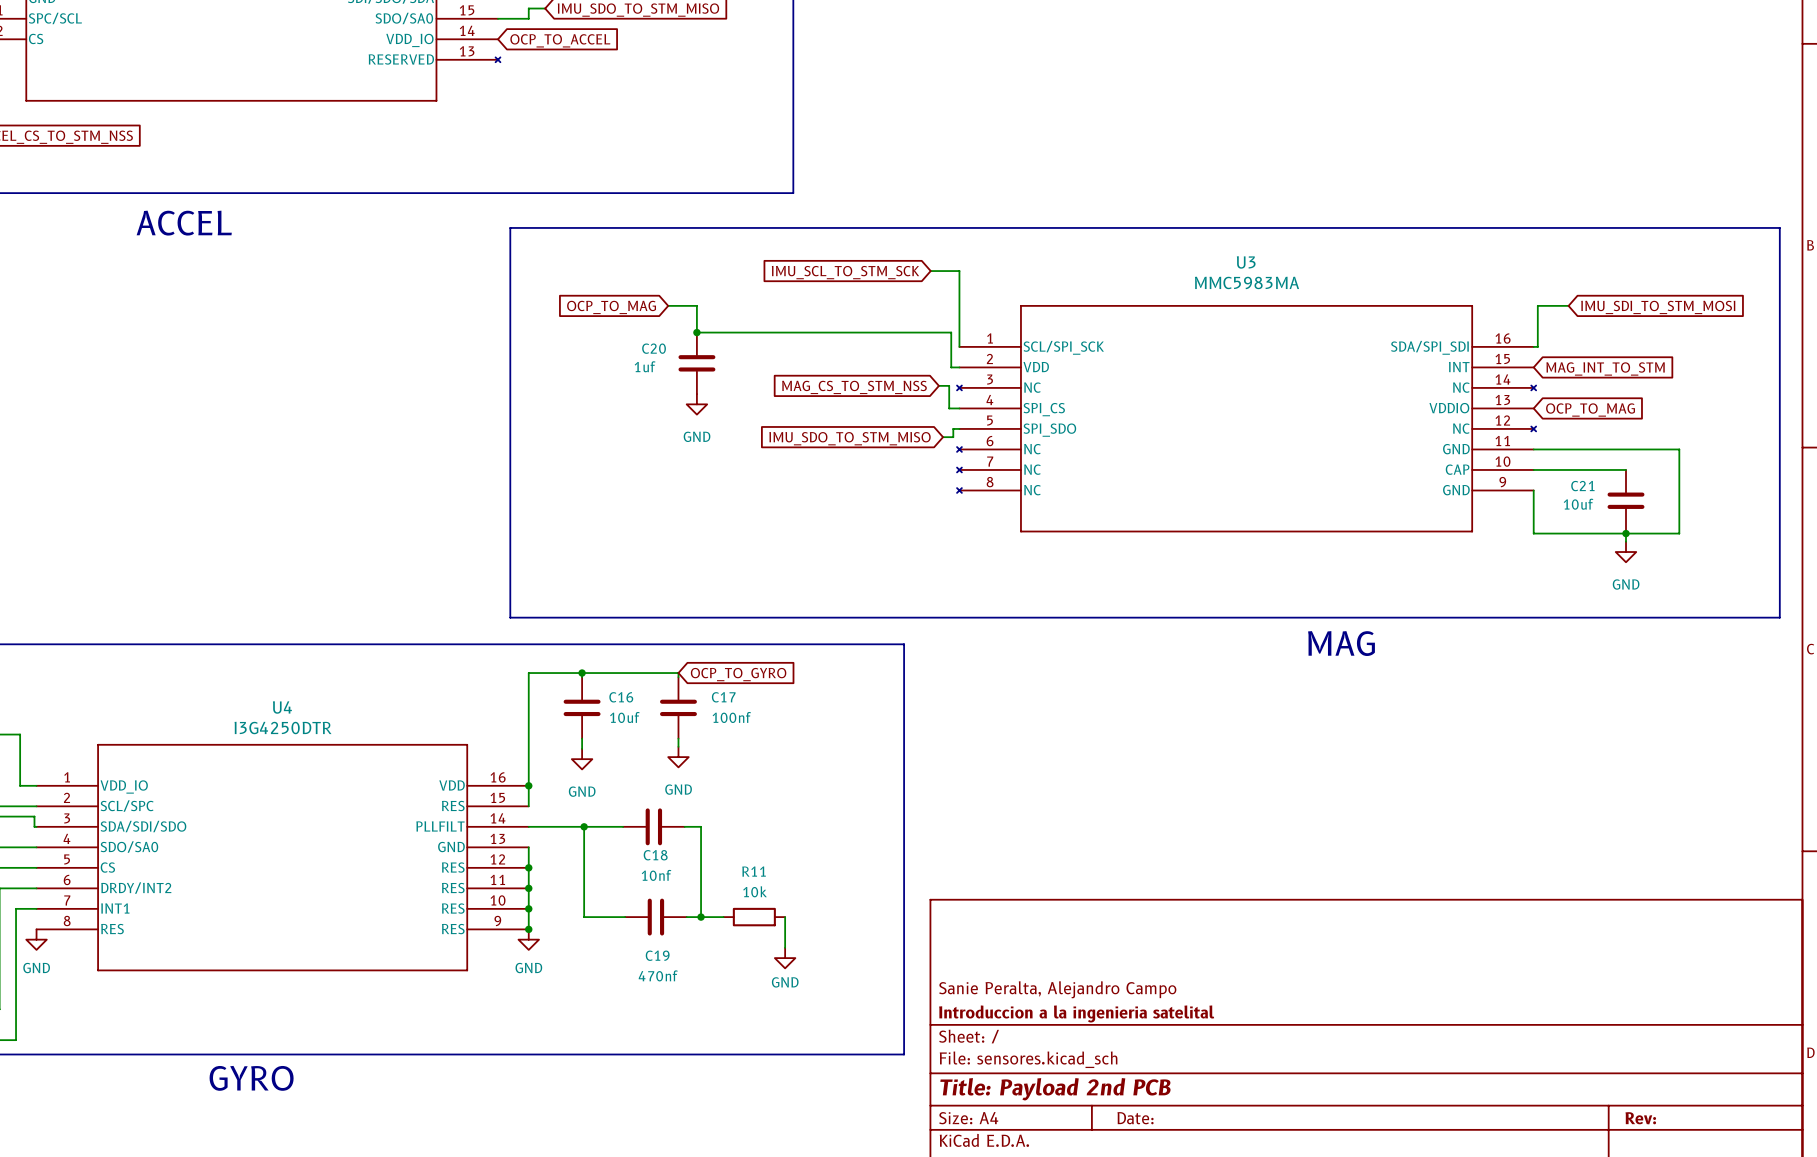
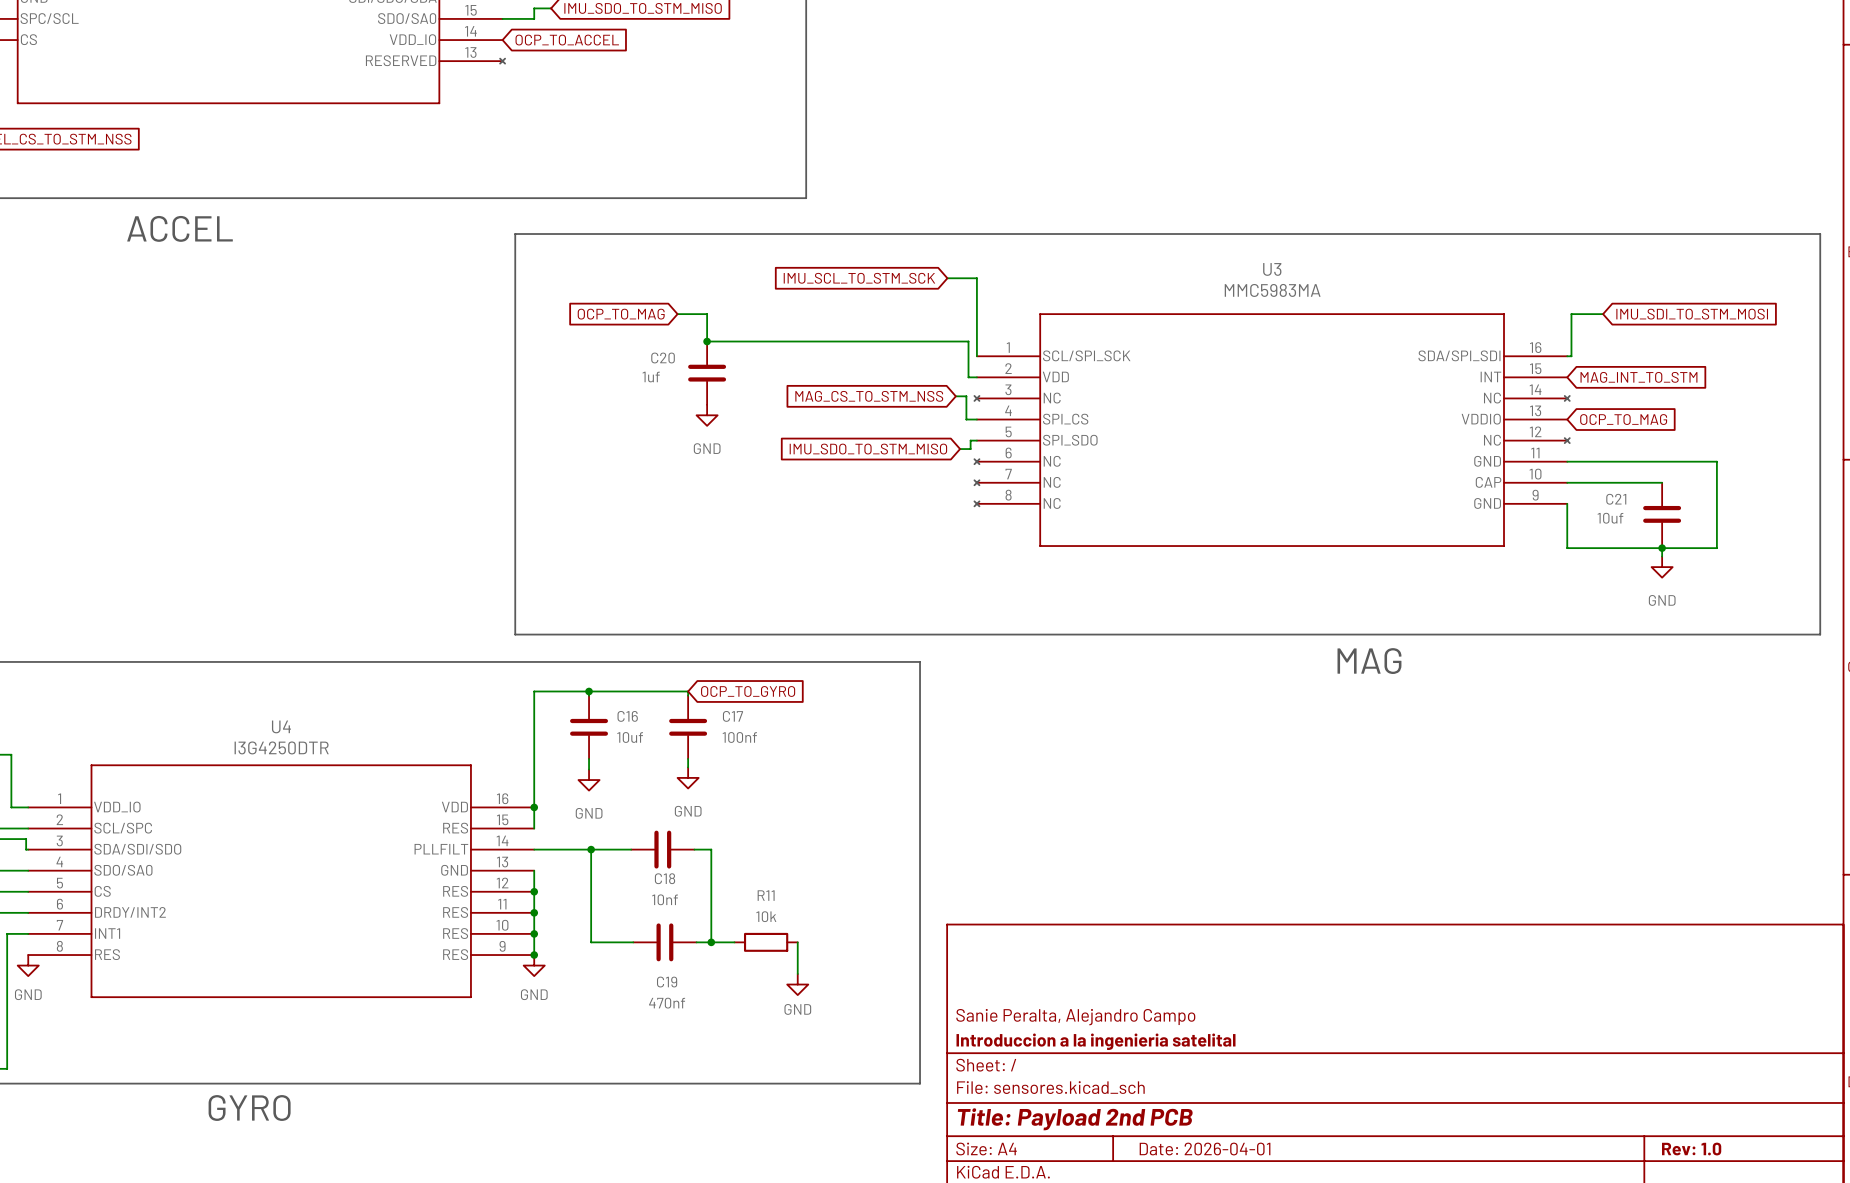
title block: Date: (1135, 1118) -> Date: 2026-04-01 (1205, 1149)
title block: Rev: (1640, 1118) -> Rev: 1.0 (1691, 1149)

